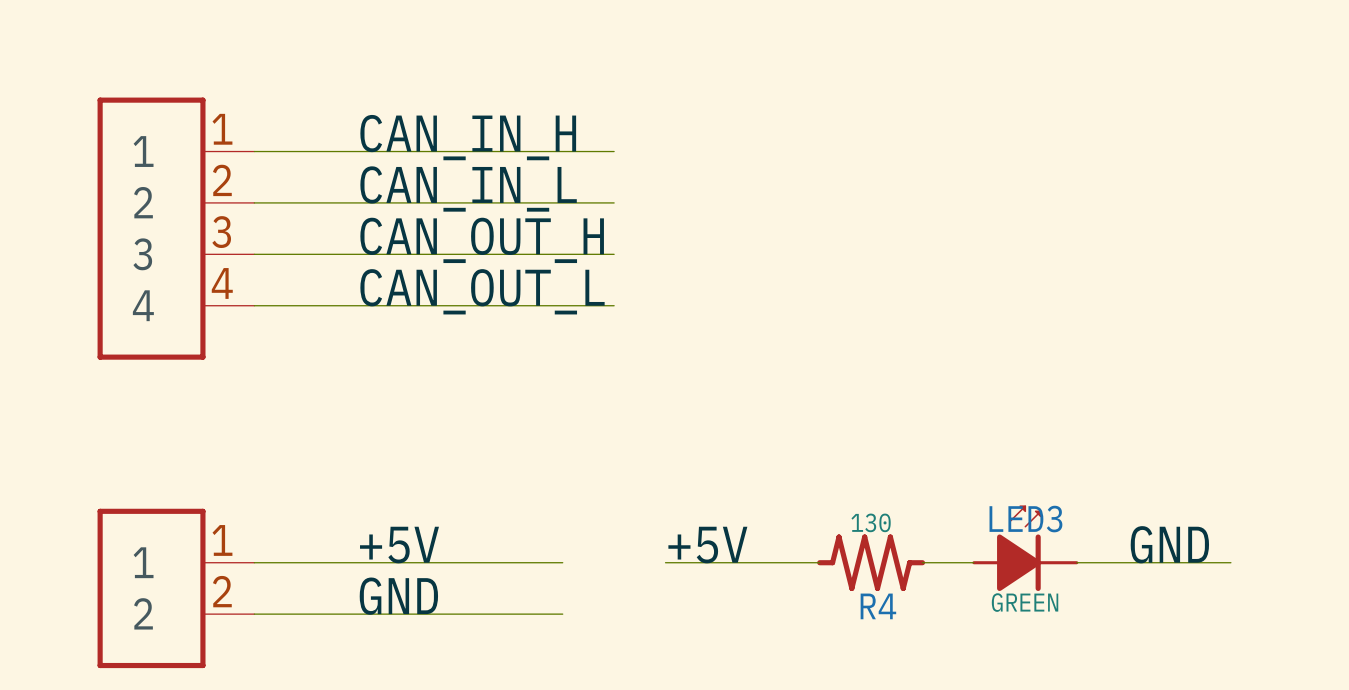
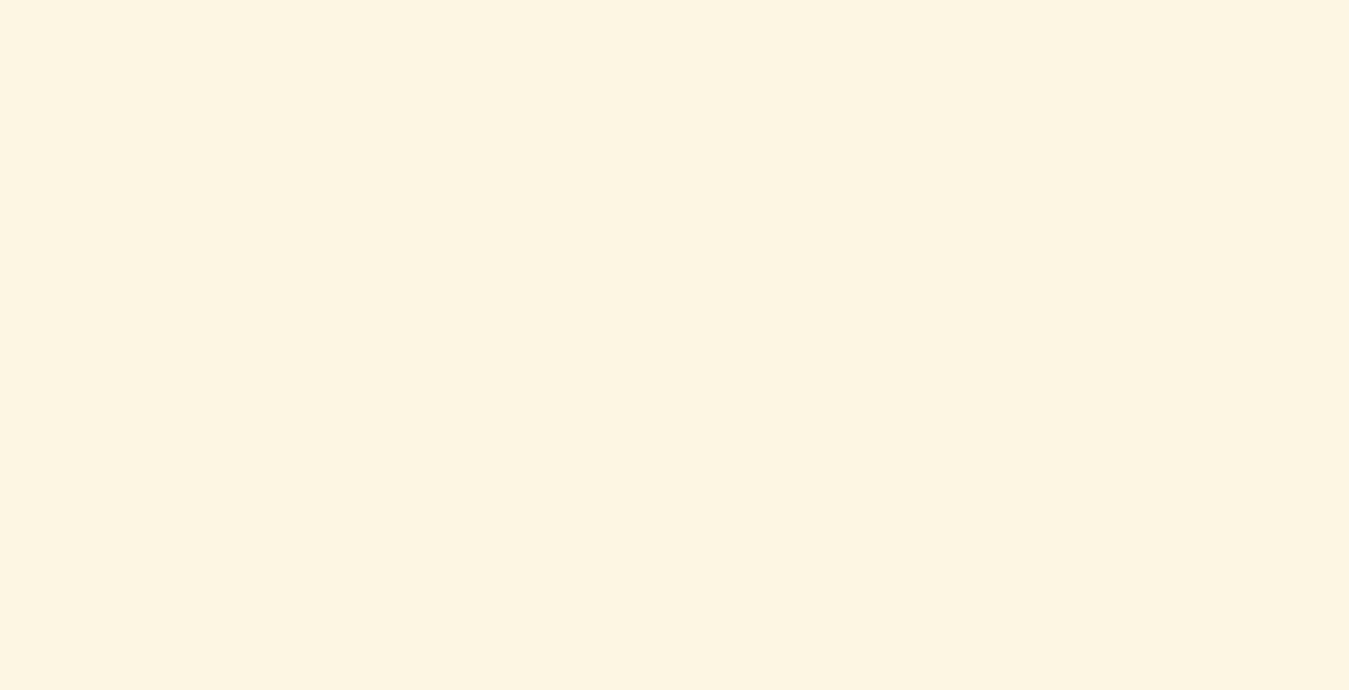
label: CAN_IN_H (468, 137) -> none
wire: (254, 151) (614, 151) -> none
label: CAN_IN_L (468, 188) -> none
wire: (254, 202) (614, 202) -> none
part: (175, 228) -> none
label: CAN_OUT_H (482, 240) -> none
wire: (254, 254) (614, 254) -> none
label: CAN_OUT_L (482, 291) -> none
wire: (254, 305) (614, 305) -> none
label: GND (1169, 544) -> none
label: +5V (399, 545) -> none
label: +5V (707, 545) -> none
LED3: GREEN (1025, 548) -> none
wire: (254, 562) (562, 562) -> none
wire: (665, 562) (819, 562) -> none
R4: 130 (871, 562) -> none
wire: (922, 562) (973, 562) -> none
wire: (1076, 562) (1230, 562) -> none
part: (175, 588) -> none
label: GND (398, 596) -> none
wire: (254, 614) (562, 614) -> none

